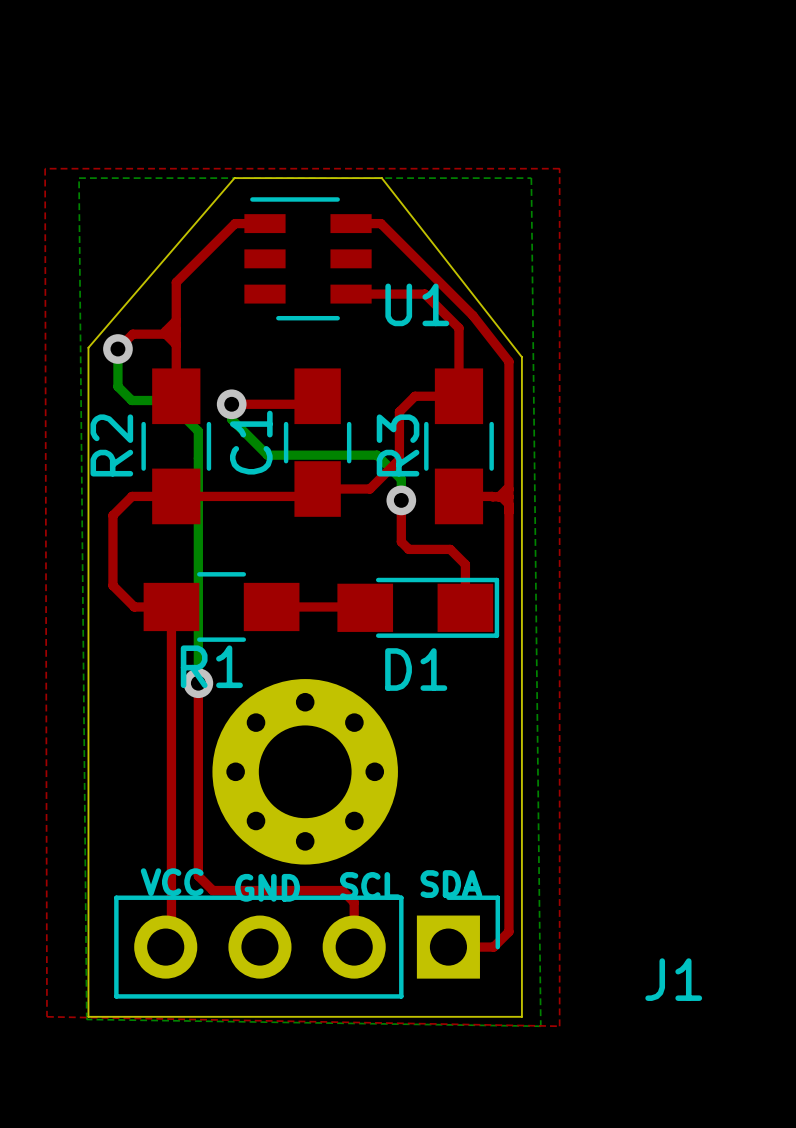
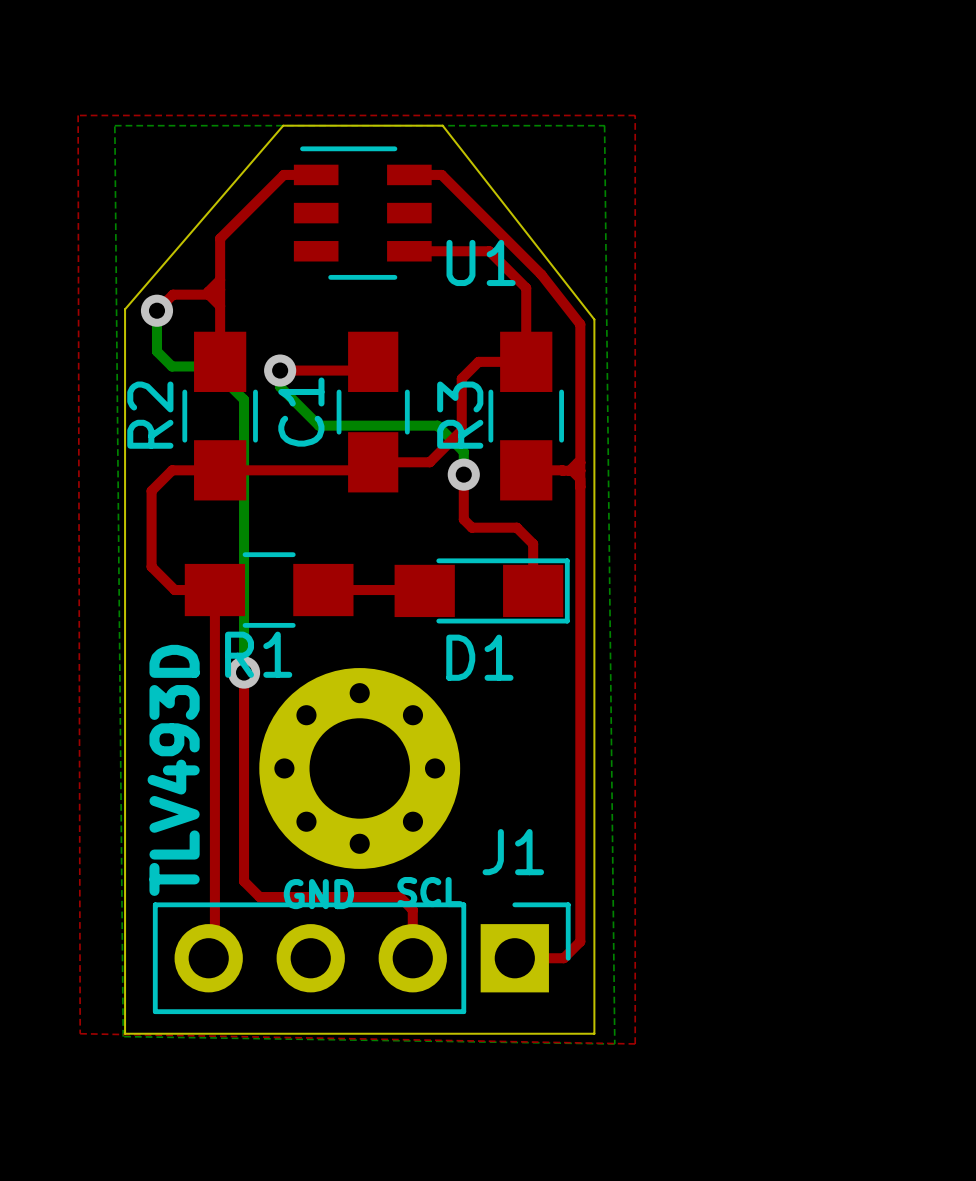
text: none -> TLV493D (173, 770)
text: VCC (172, 882) -> none
text: SDA (451, 884) -> none
J1 name position: J1 (673, 979) -> J1 (513, 852)

